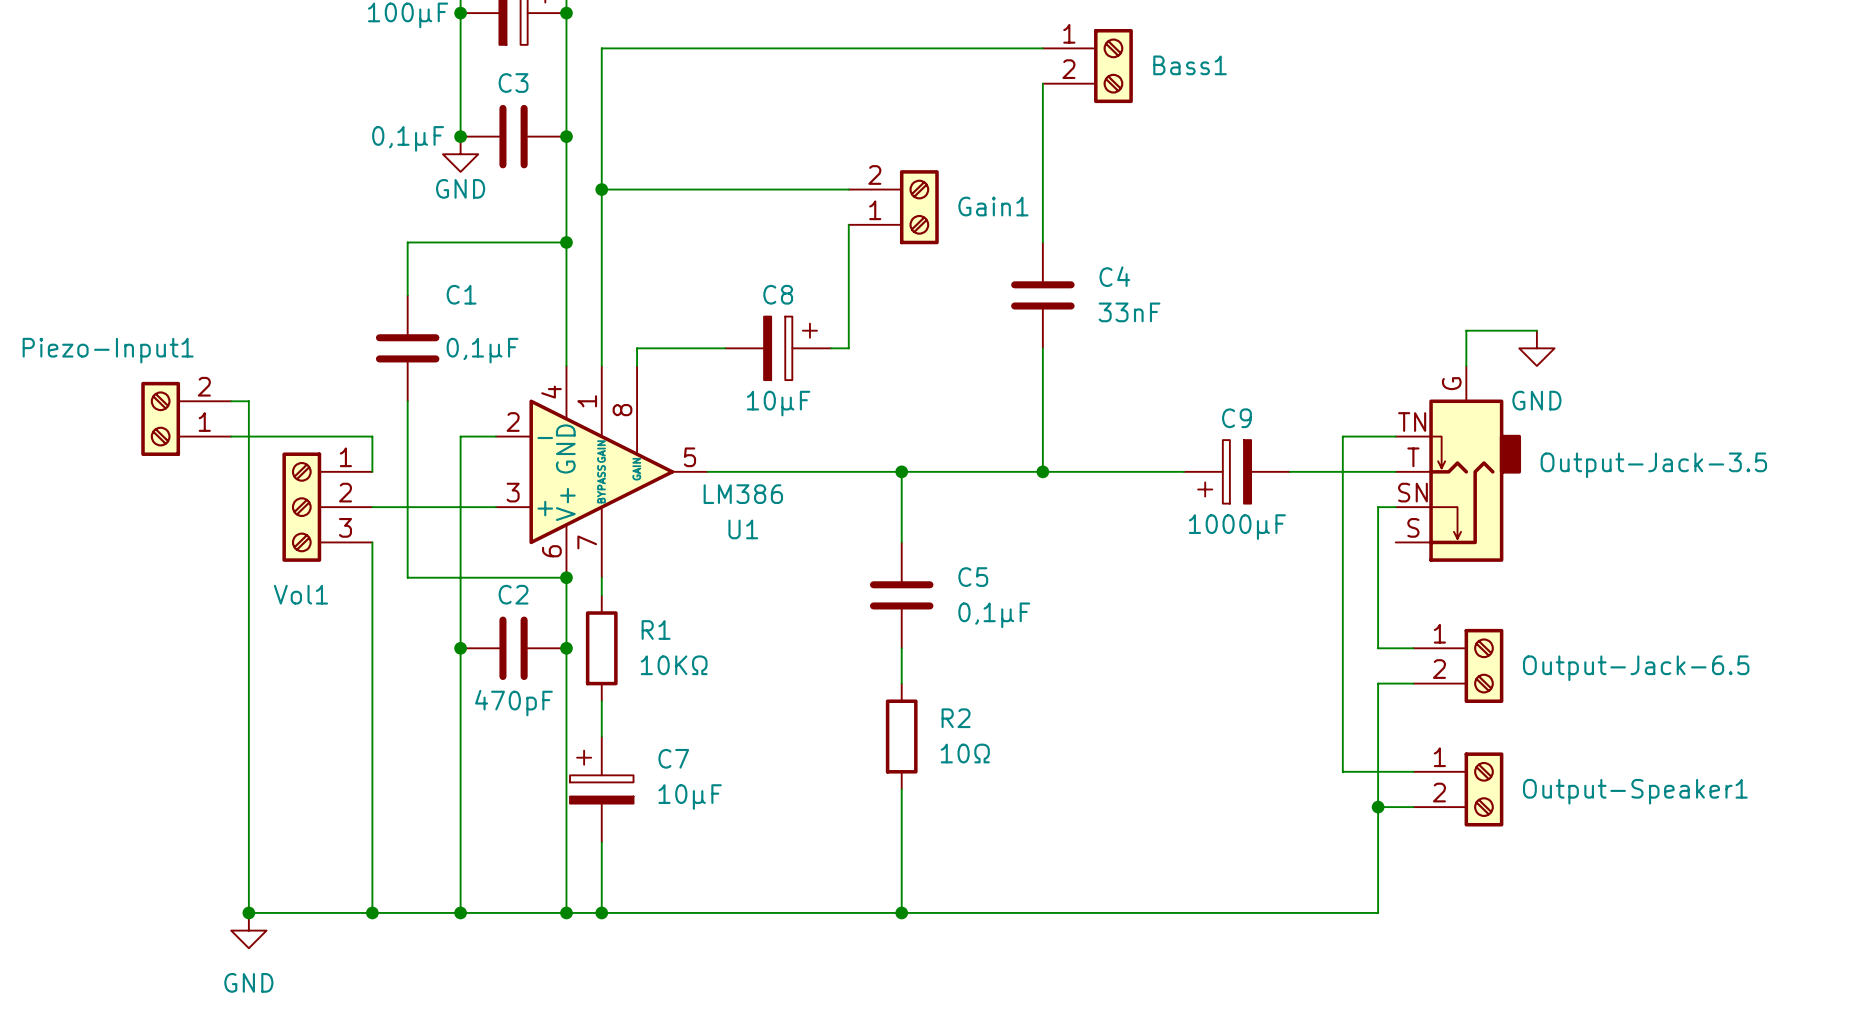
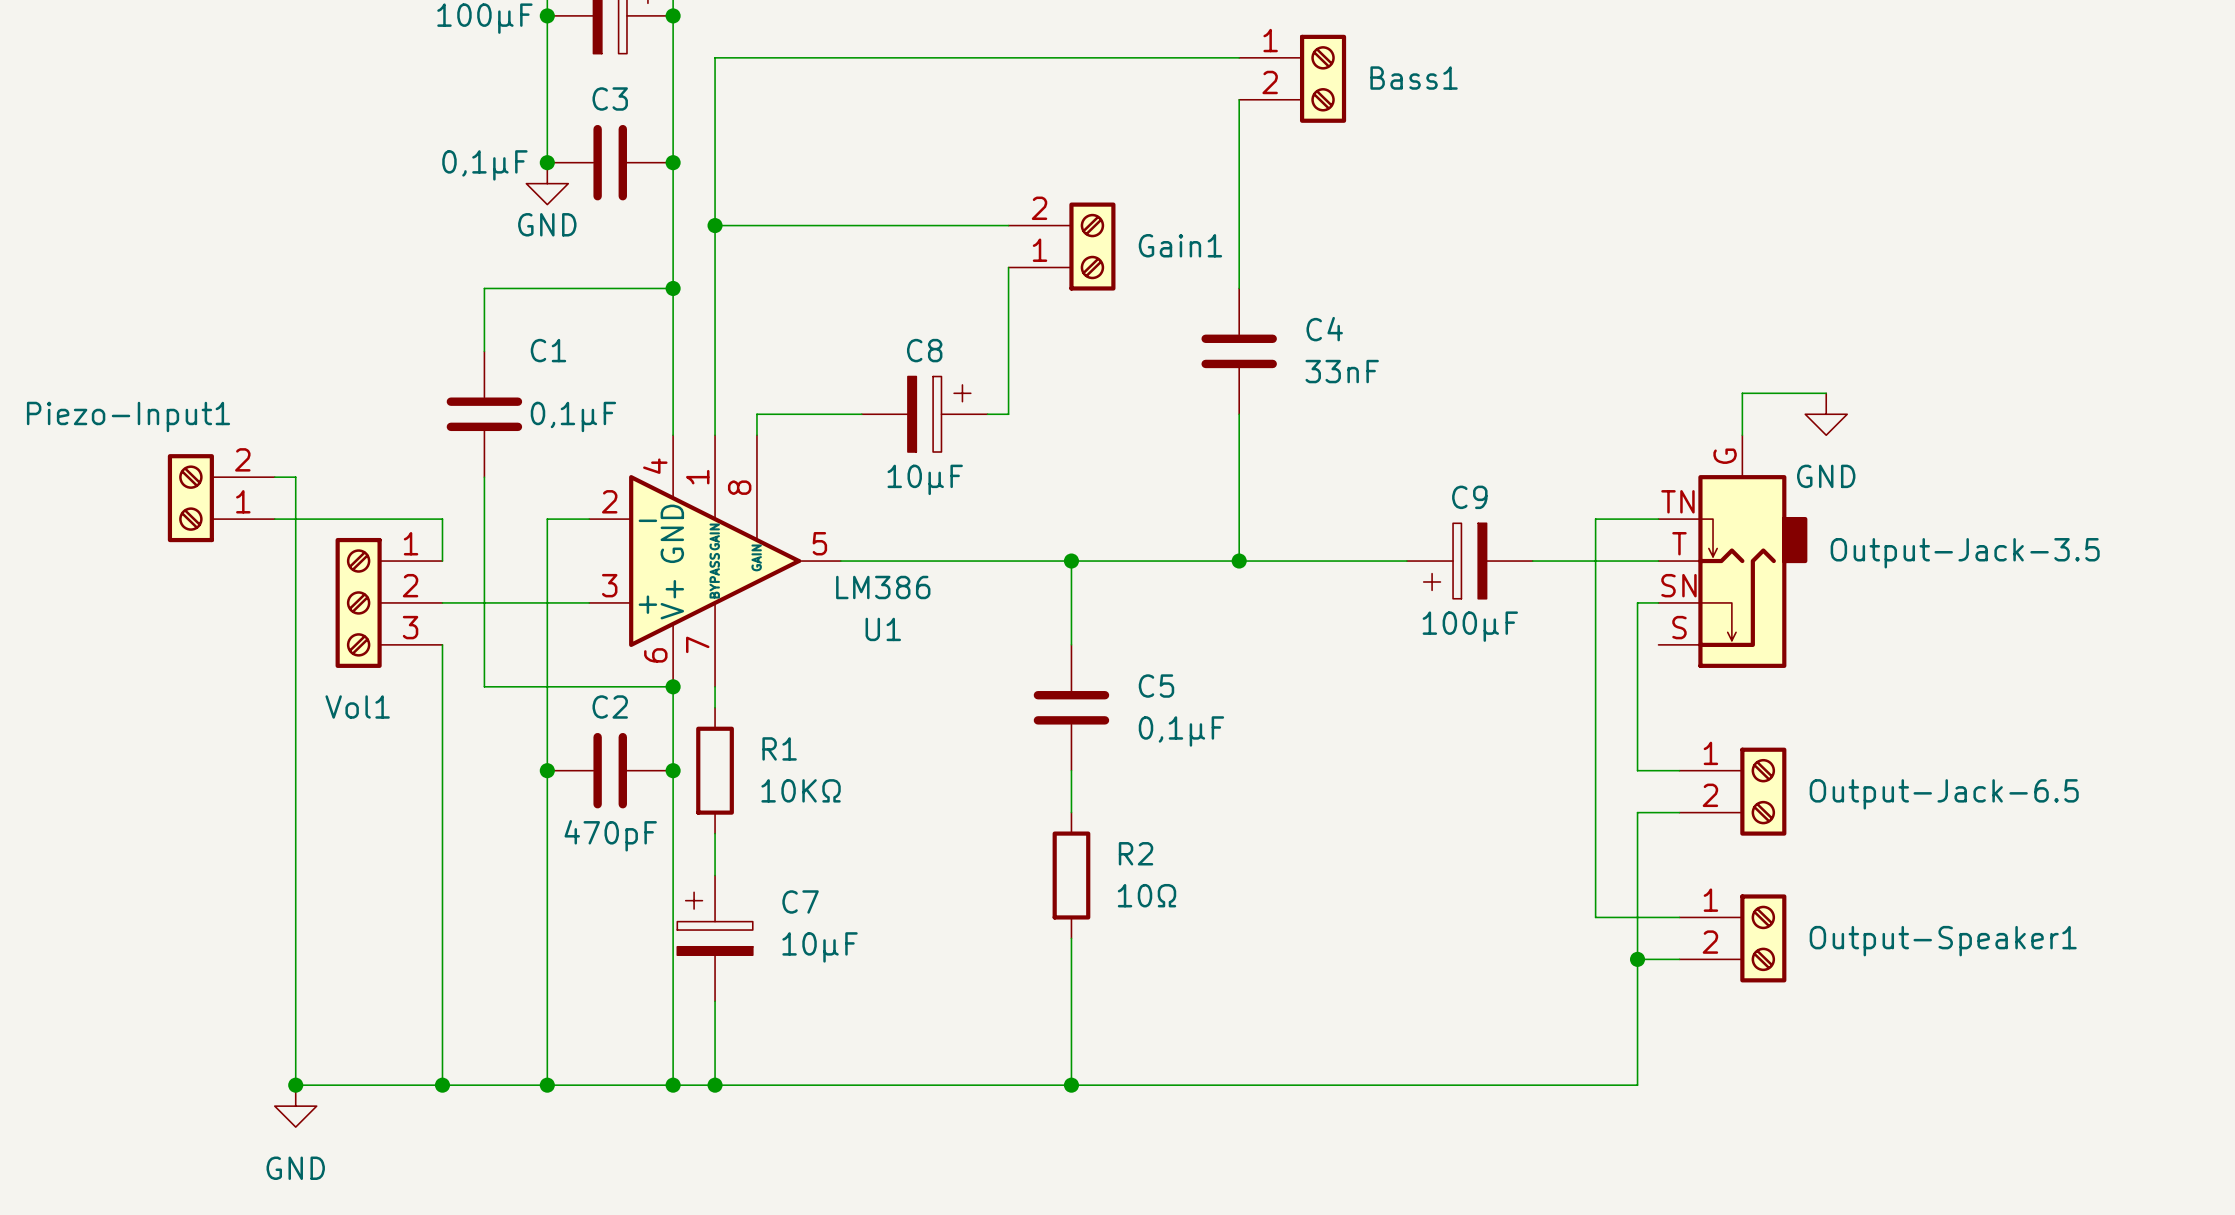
C9 value: 1000µF (1237, 527) -> 100µF (1470, 626)

